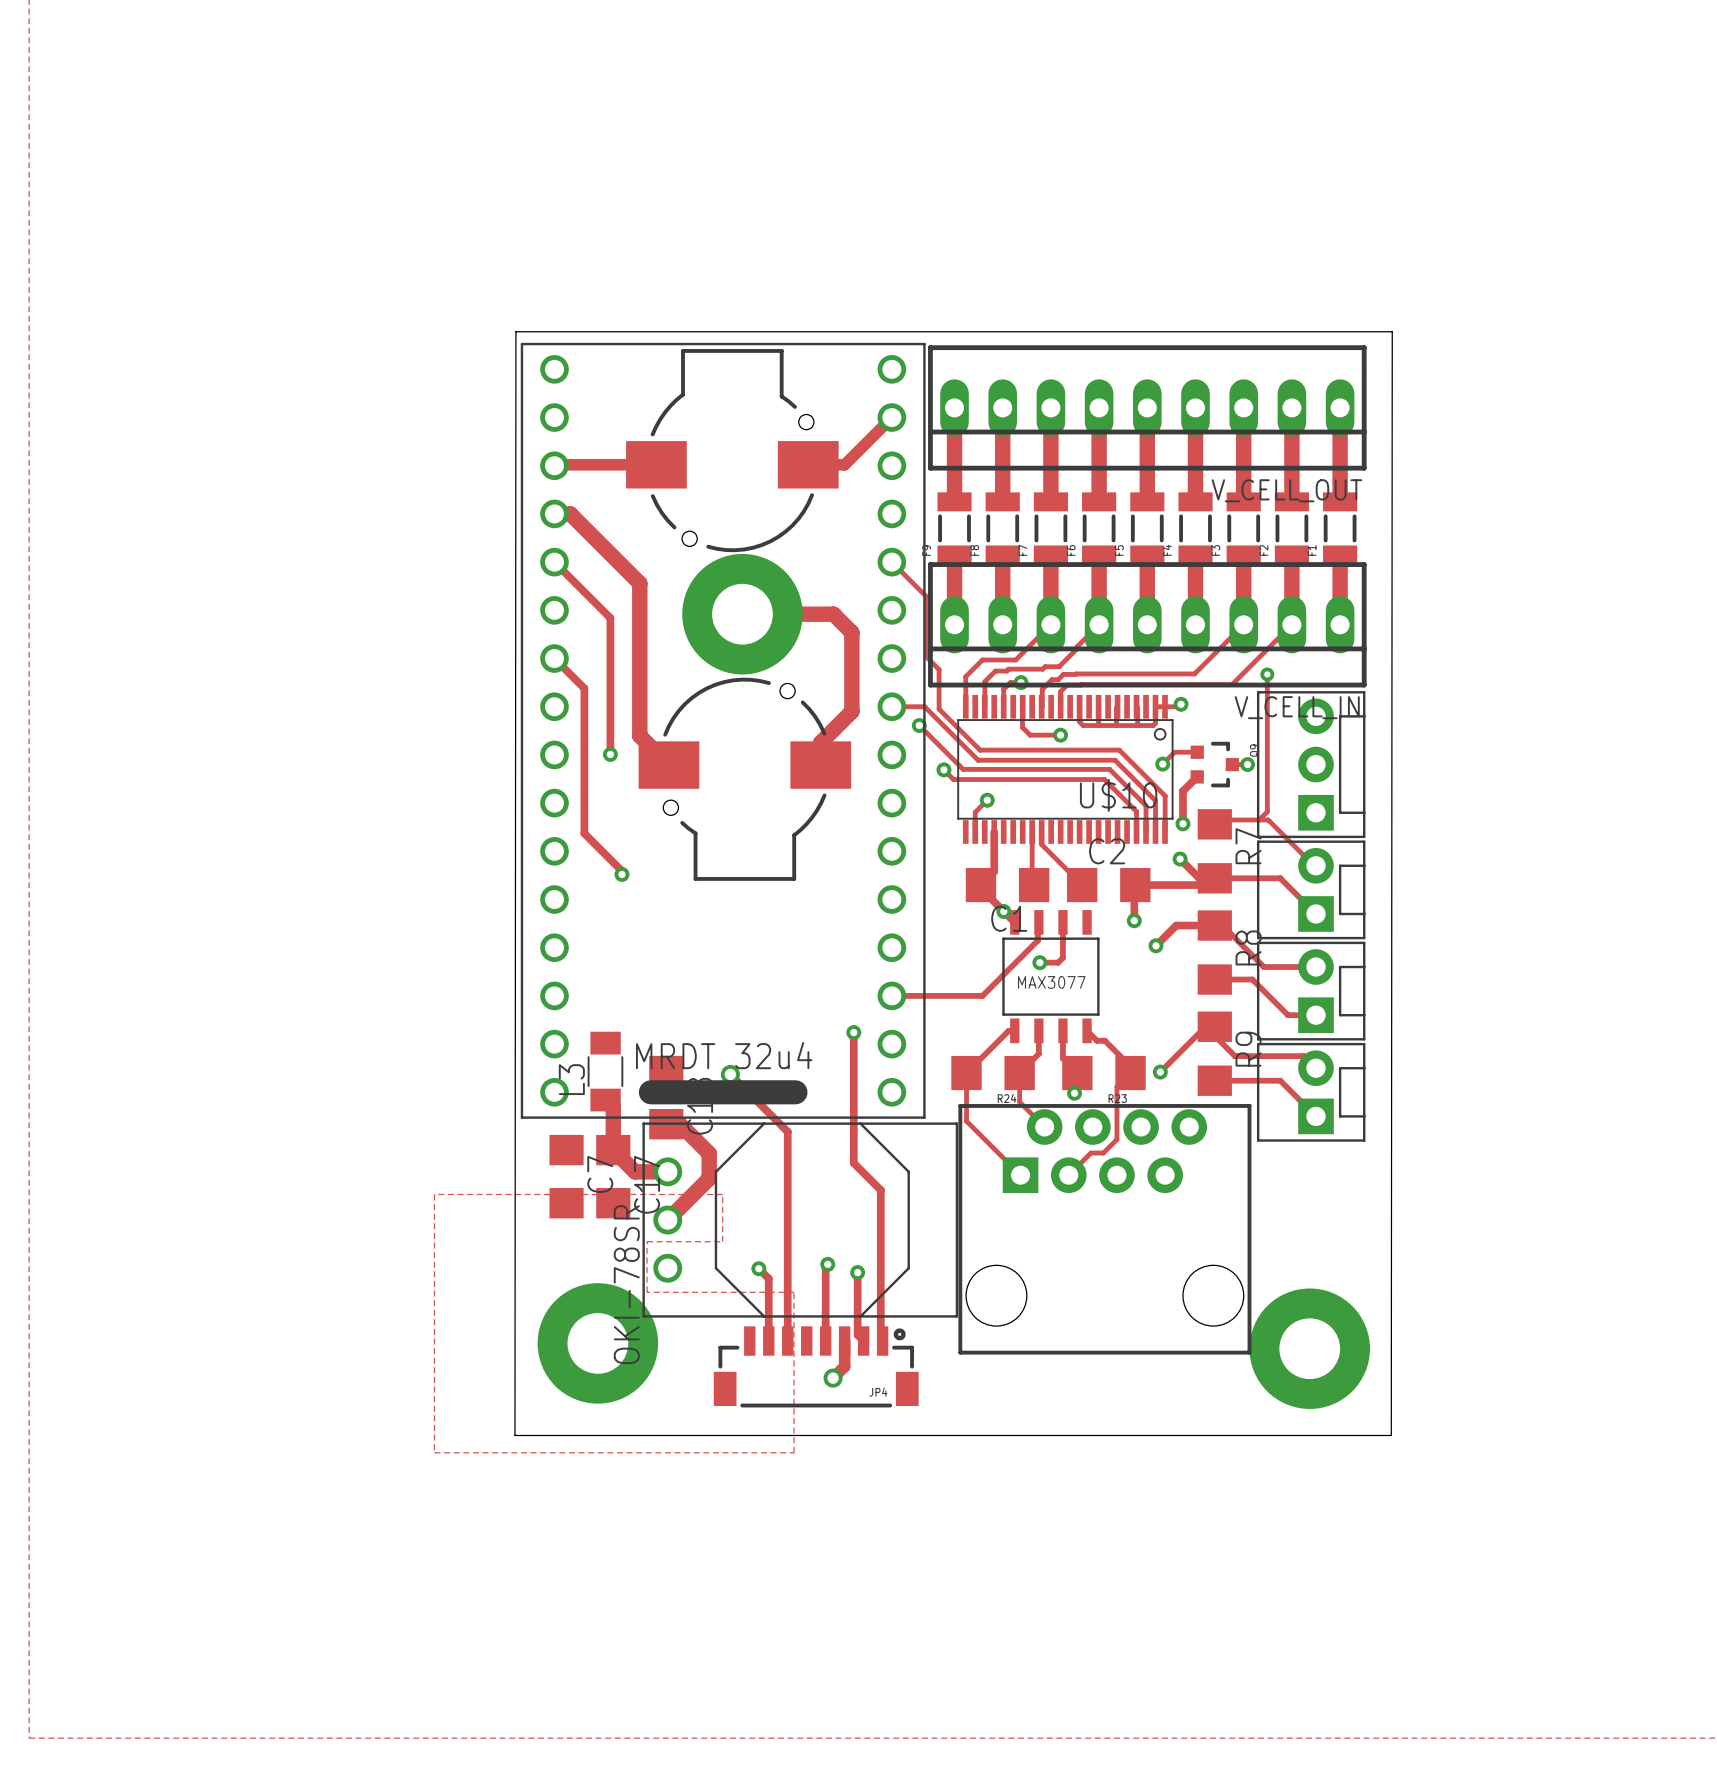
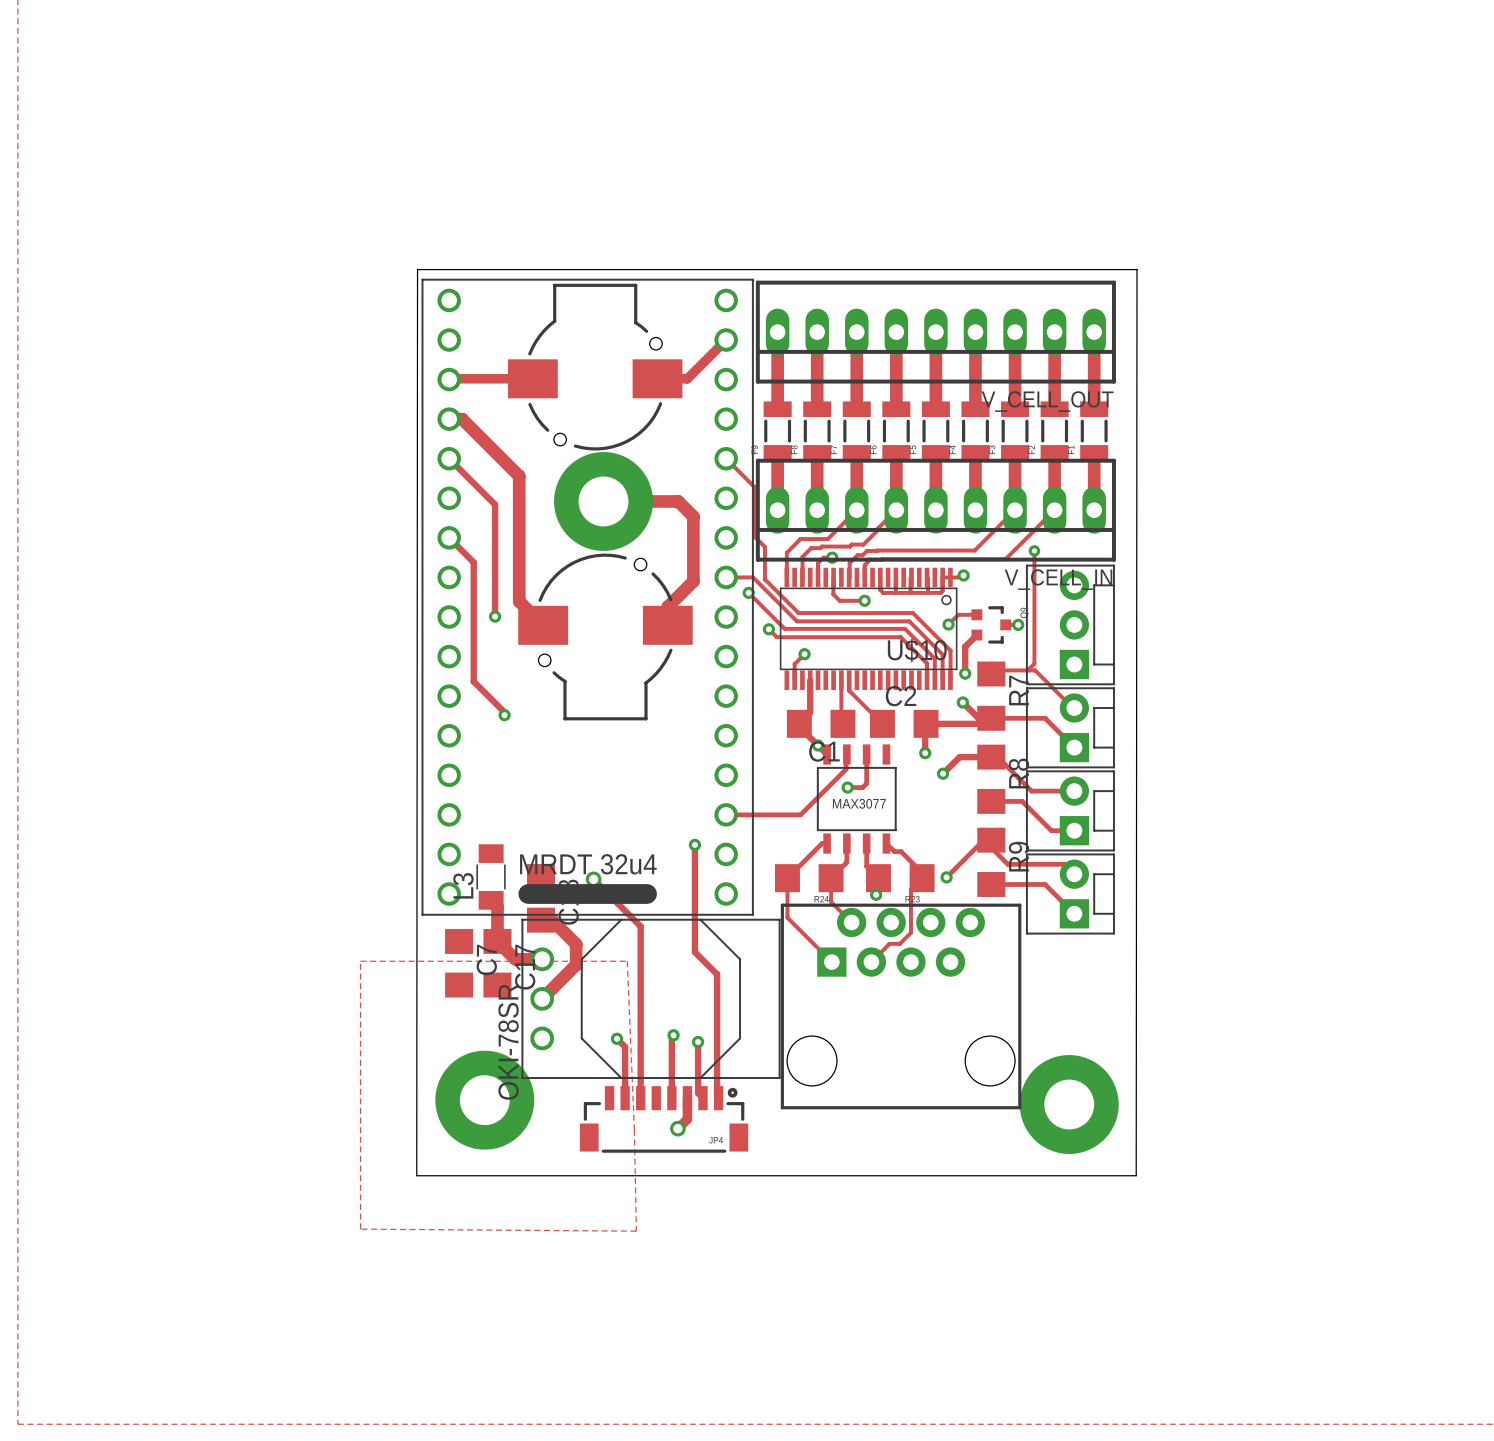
zone outline: (434, 1194) (722, 1194) (722, 1241) (647, 1241) (647, 1292) (794, 1292) (794, 1452) (434, 1452) (434, 1194) -> (360, 961) (360, 1229) (636, 1231) (627, 961) (360, 961)

